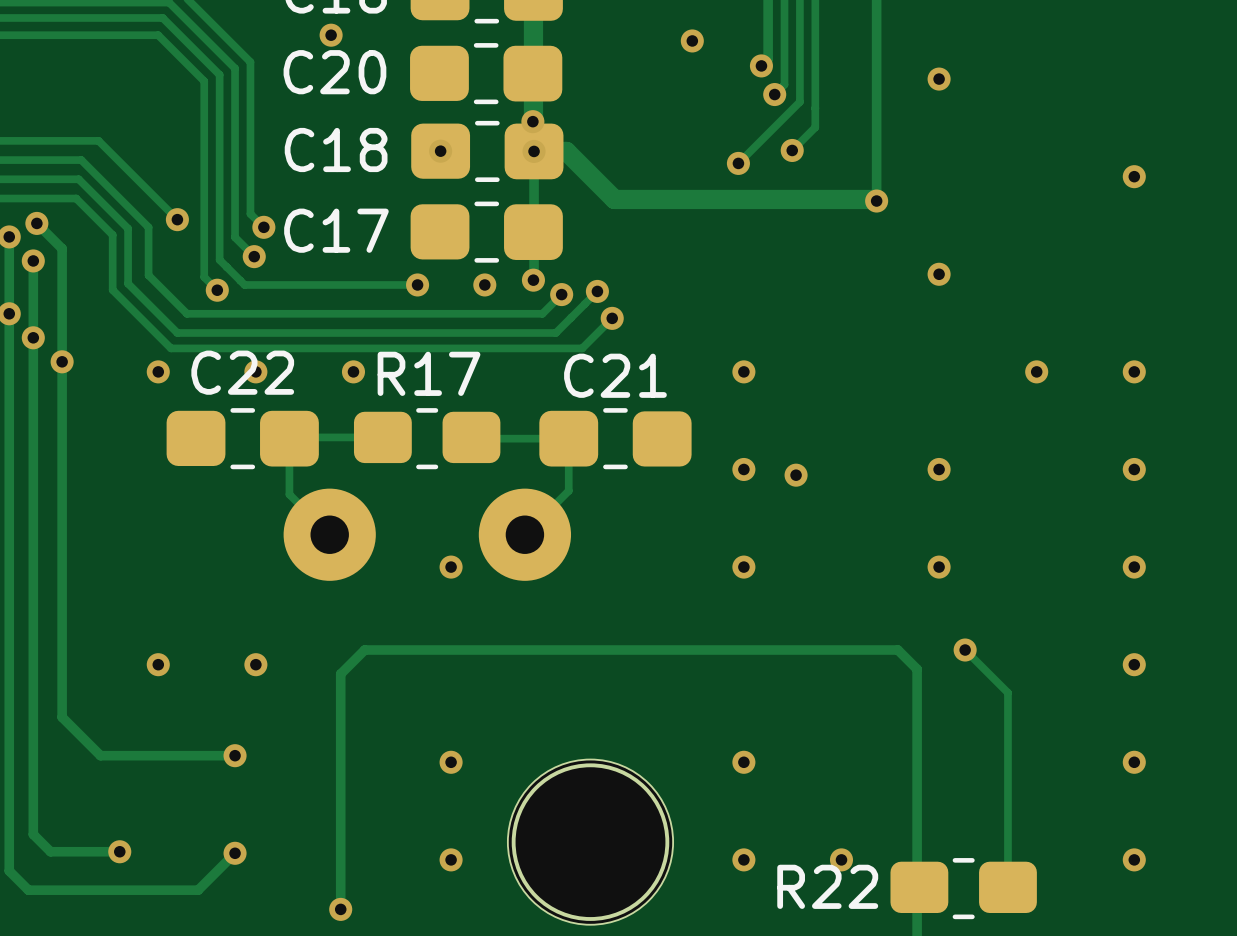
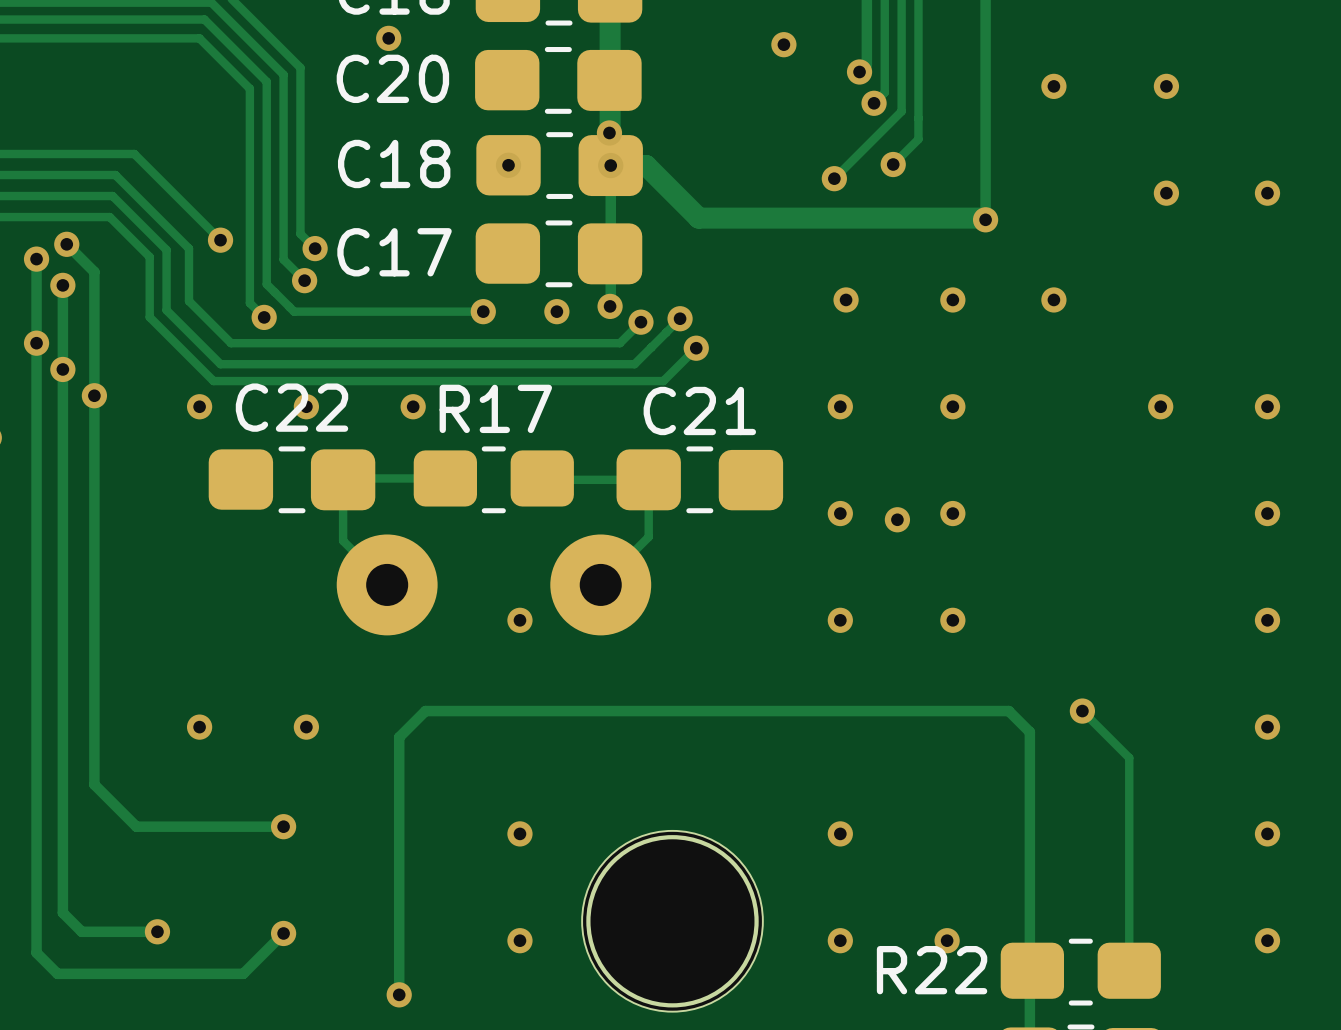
via: none -> (1166, 86)
via: none -> (1166, 193)
via: none -> (846, 299)
via: none -> (952, 299)
via: none -> (952, 406)
via: none -> (952, 513)
via: (939, 469) -> none
via: none -> (952, 620)
via: (939, 567) -> none

